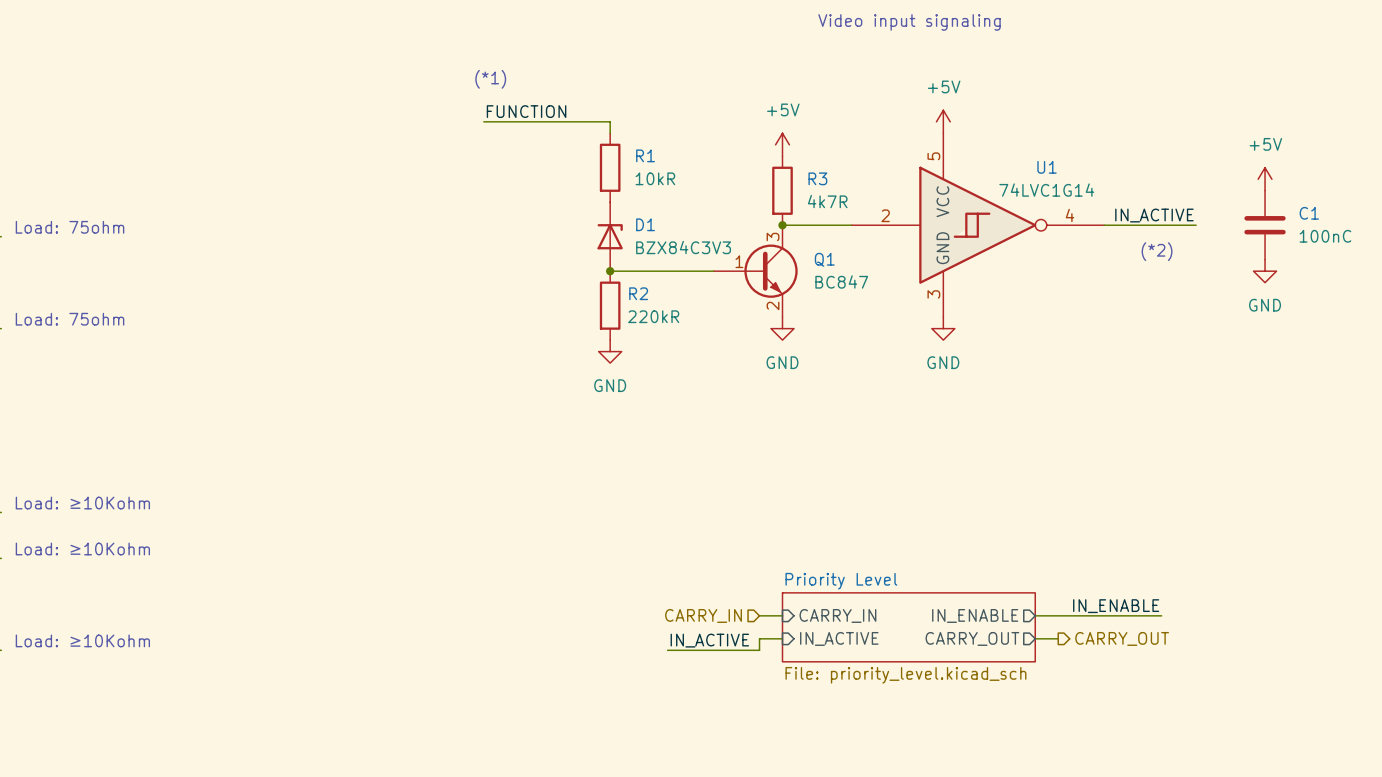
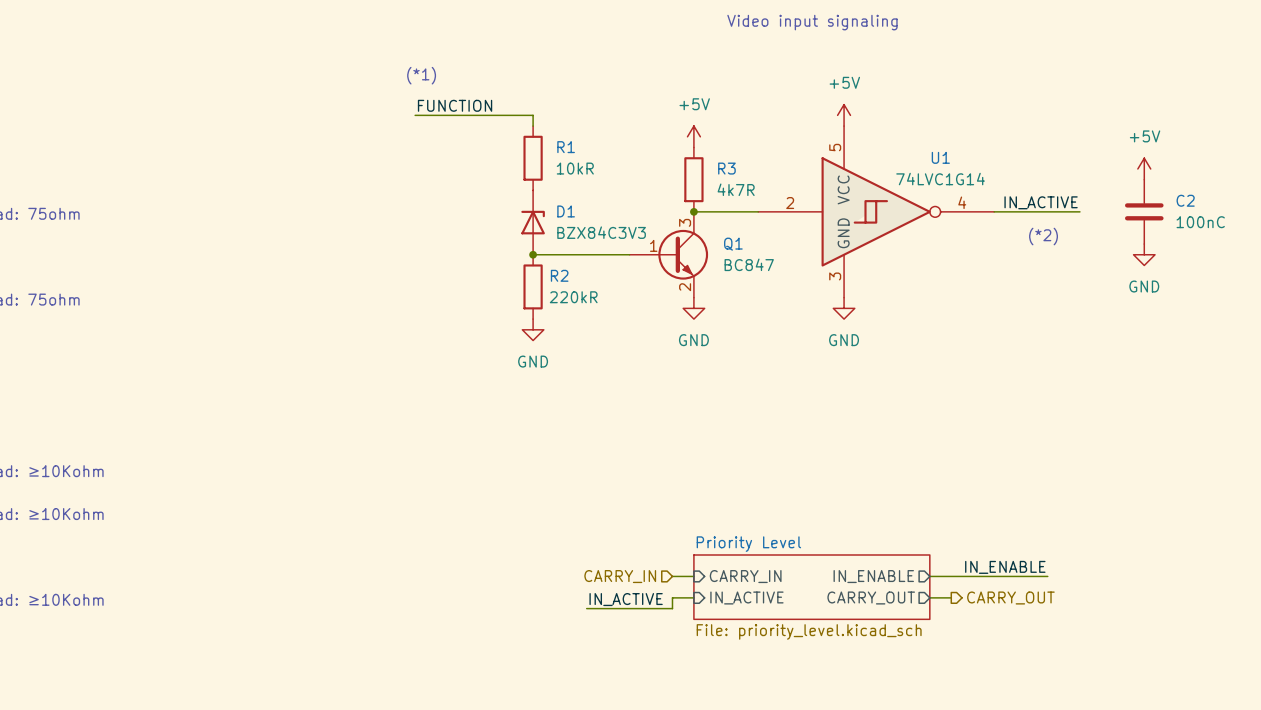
C1 name: C1 (1309, 213) -> C2 (1185, 200)

